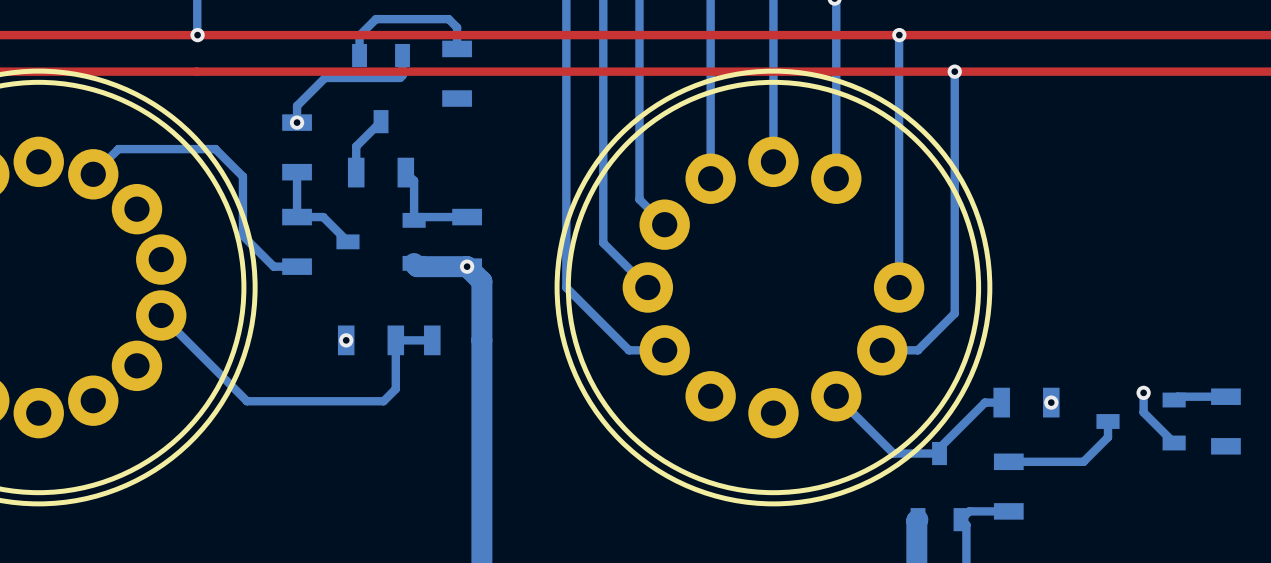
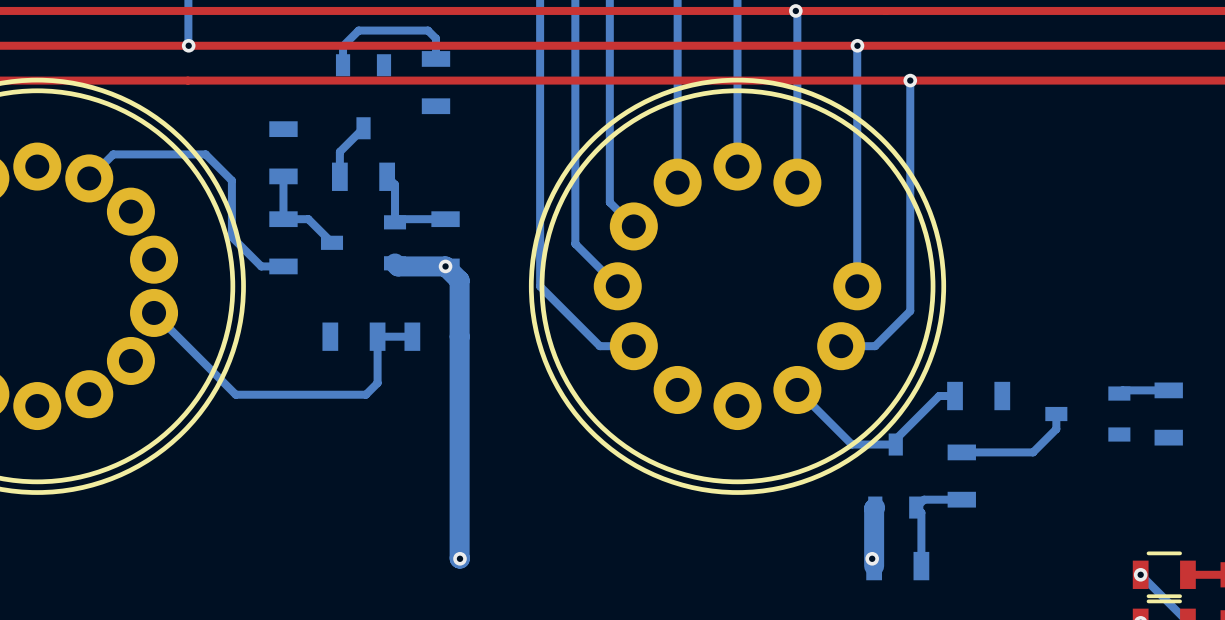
bottom track: (402, 55) (402, 75) (400, 77) (325, 77) (297, 105) (297, 122) -> none
via: (297, 122) -> none
via: (346, 340) -> none
bottom track: (1143, 392) (1143, 412) (1174, 442) -> none
via: (1143, 392) -> none
via: (1051, 402) -> none

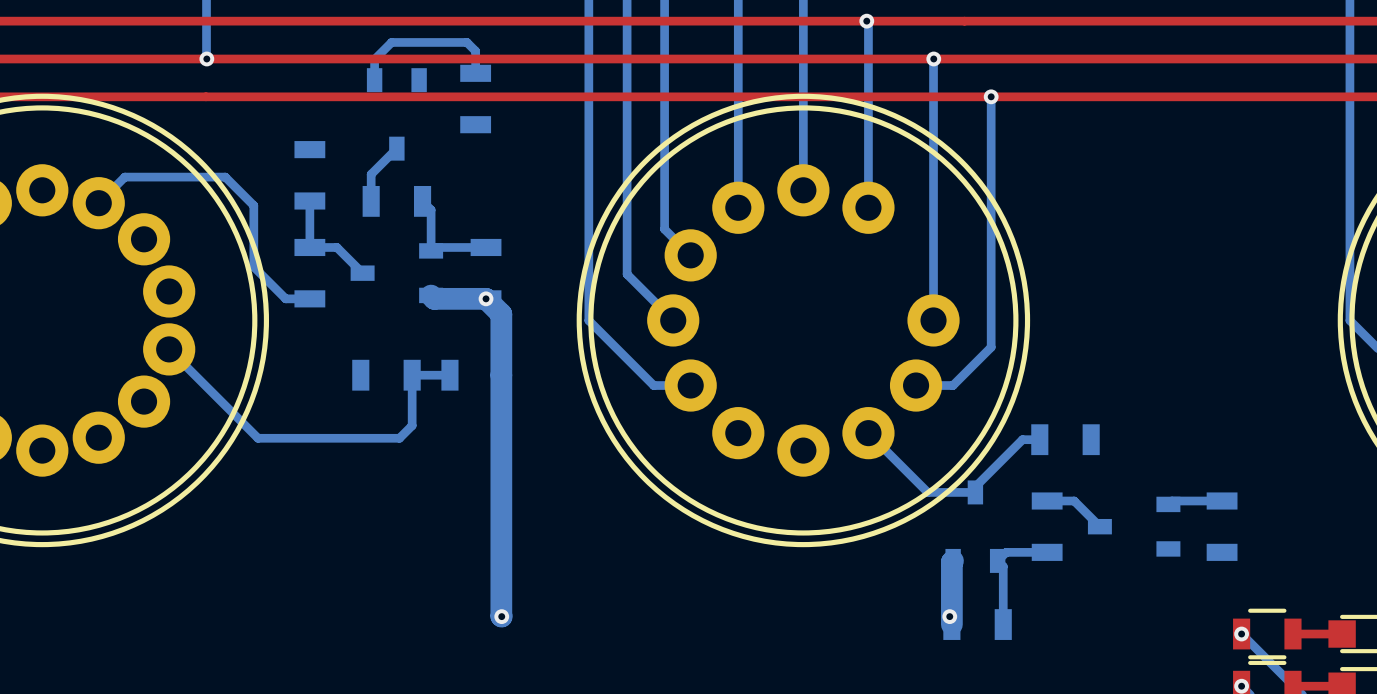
bottom track: (1168, 390) (1122, 390) (1119, 393) -> (1222, 500) (1171, 500) (1168, 504)
bottom track: (1056, 414) (1056, 429) (1033, 452) (986, 452) -> (1099, 526) (1074, 500)
part position: (1087, 414) -> (1134, 526)
part position: (1168, 414) -> (1222, 526)

